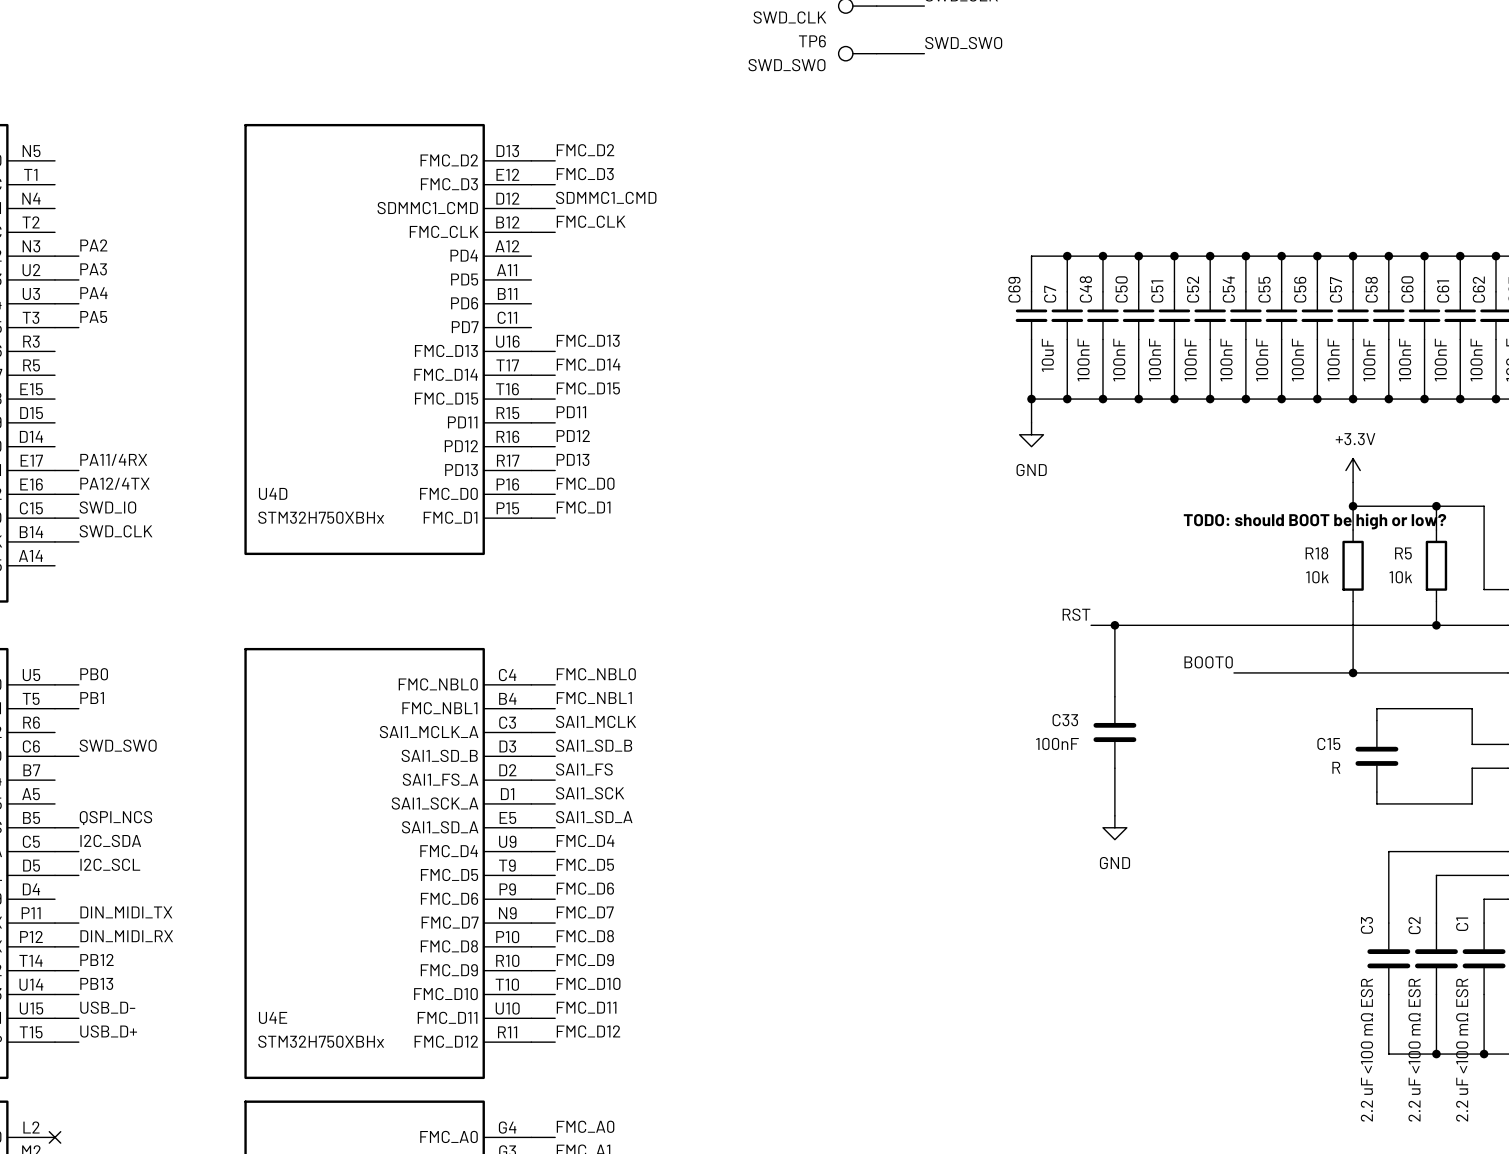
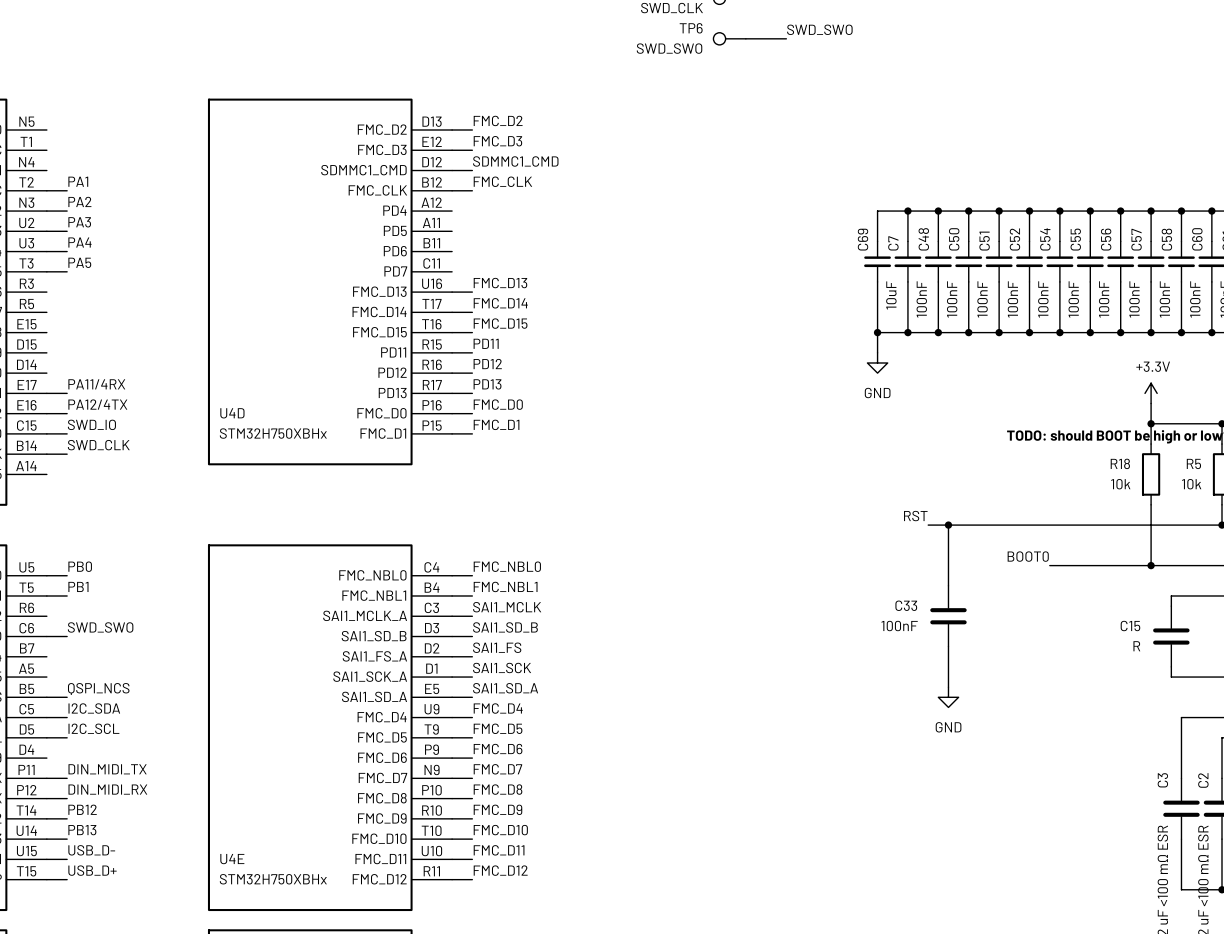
label: none -> PA1 (78, 181)
wire: none -> (46, 190) (67, 190)

